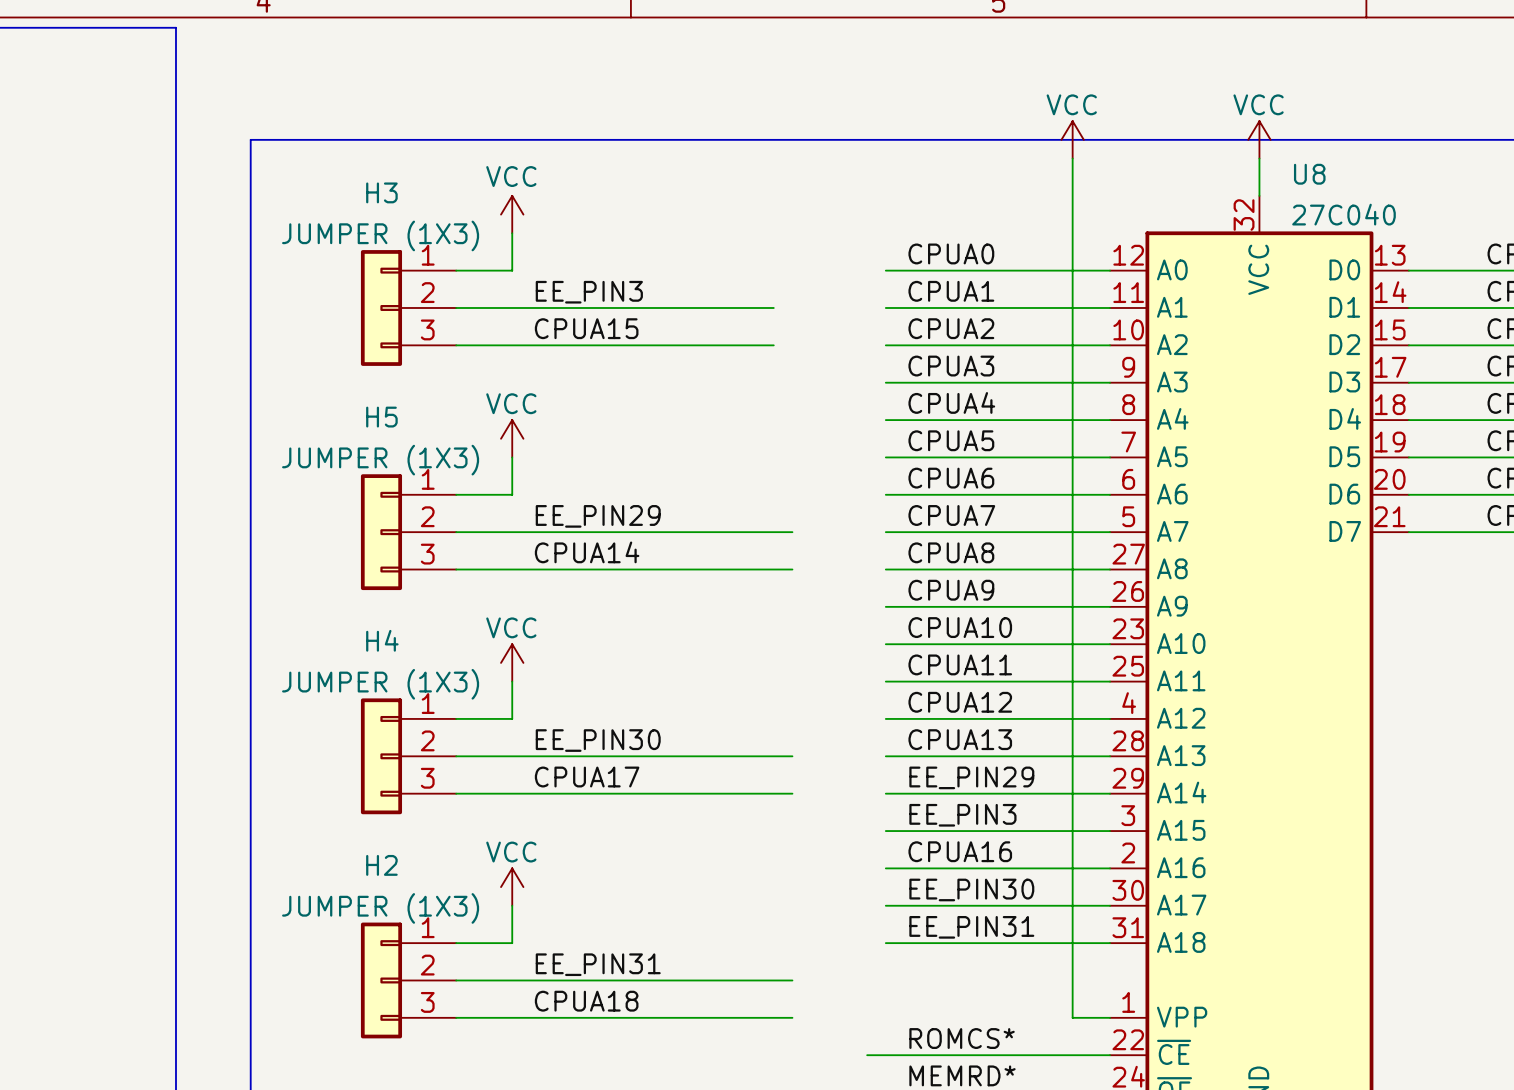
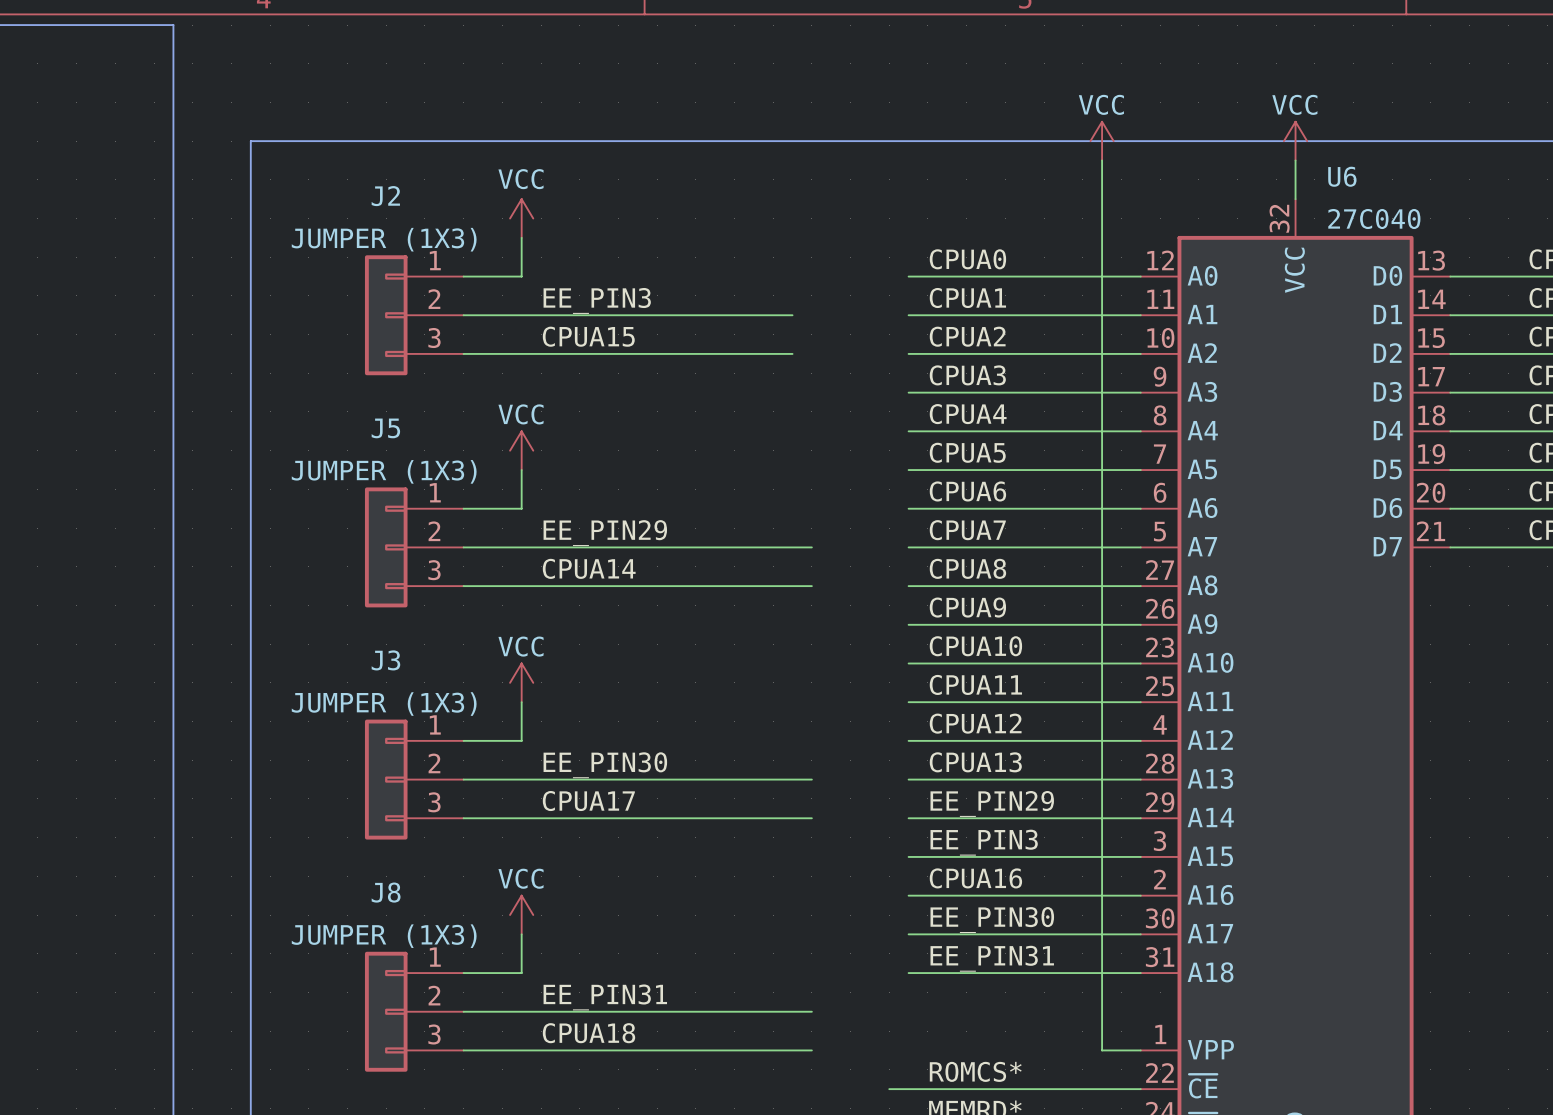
U8 name: U8 (1309, 174) -> U6 (1342, 176)
H3 name: H3 (381, 192) -> J2 (385, 196)
H5 name: H5 (381, 417) -> J5 (385, 428)
H4 name: H4 (382, 640) -> J3 (385, 660)
H2 name: H2 (381, 865) -> J8 (386, 892)

